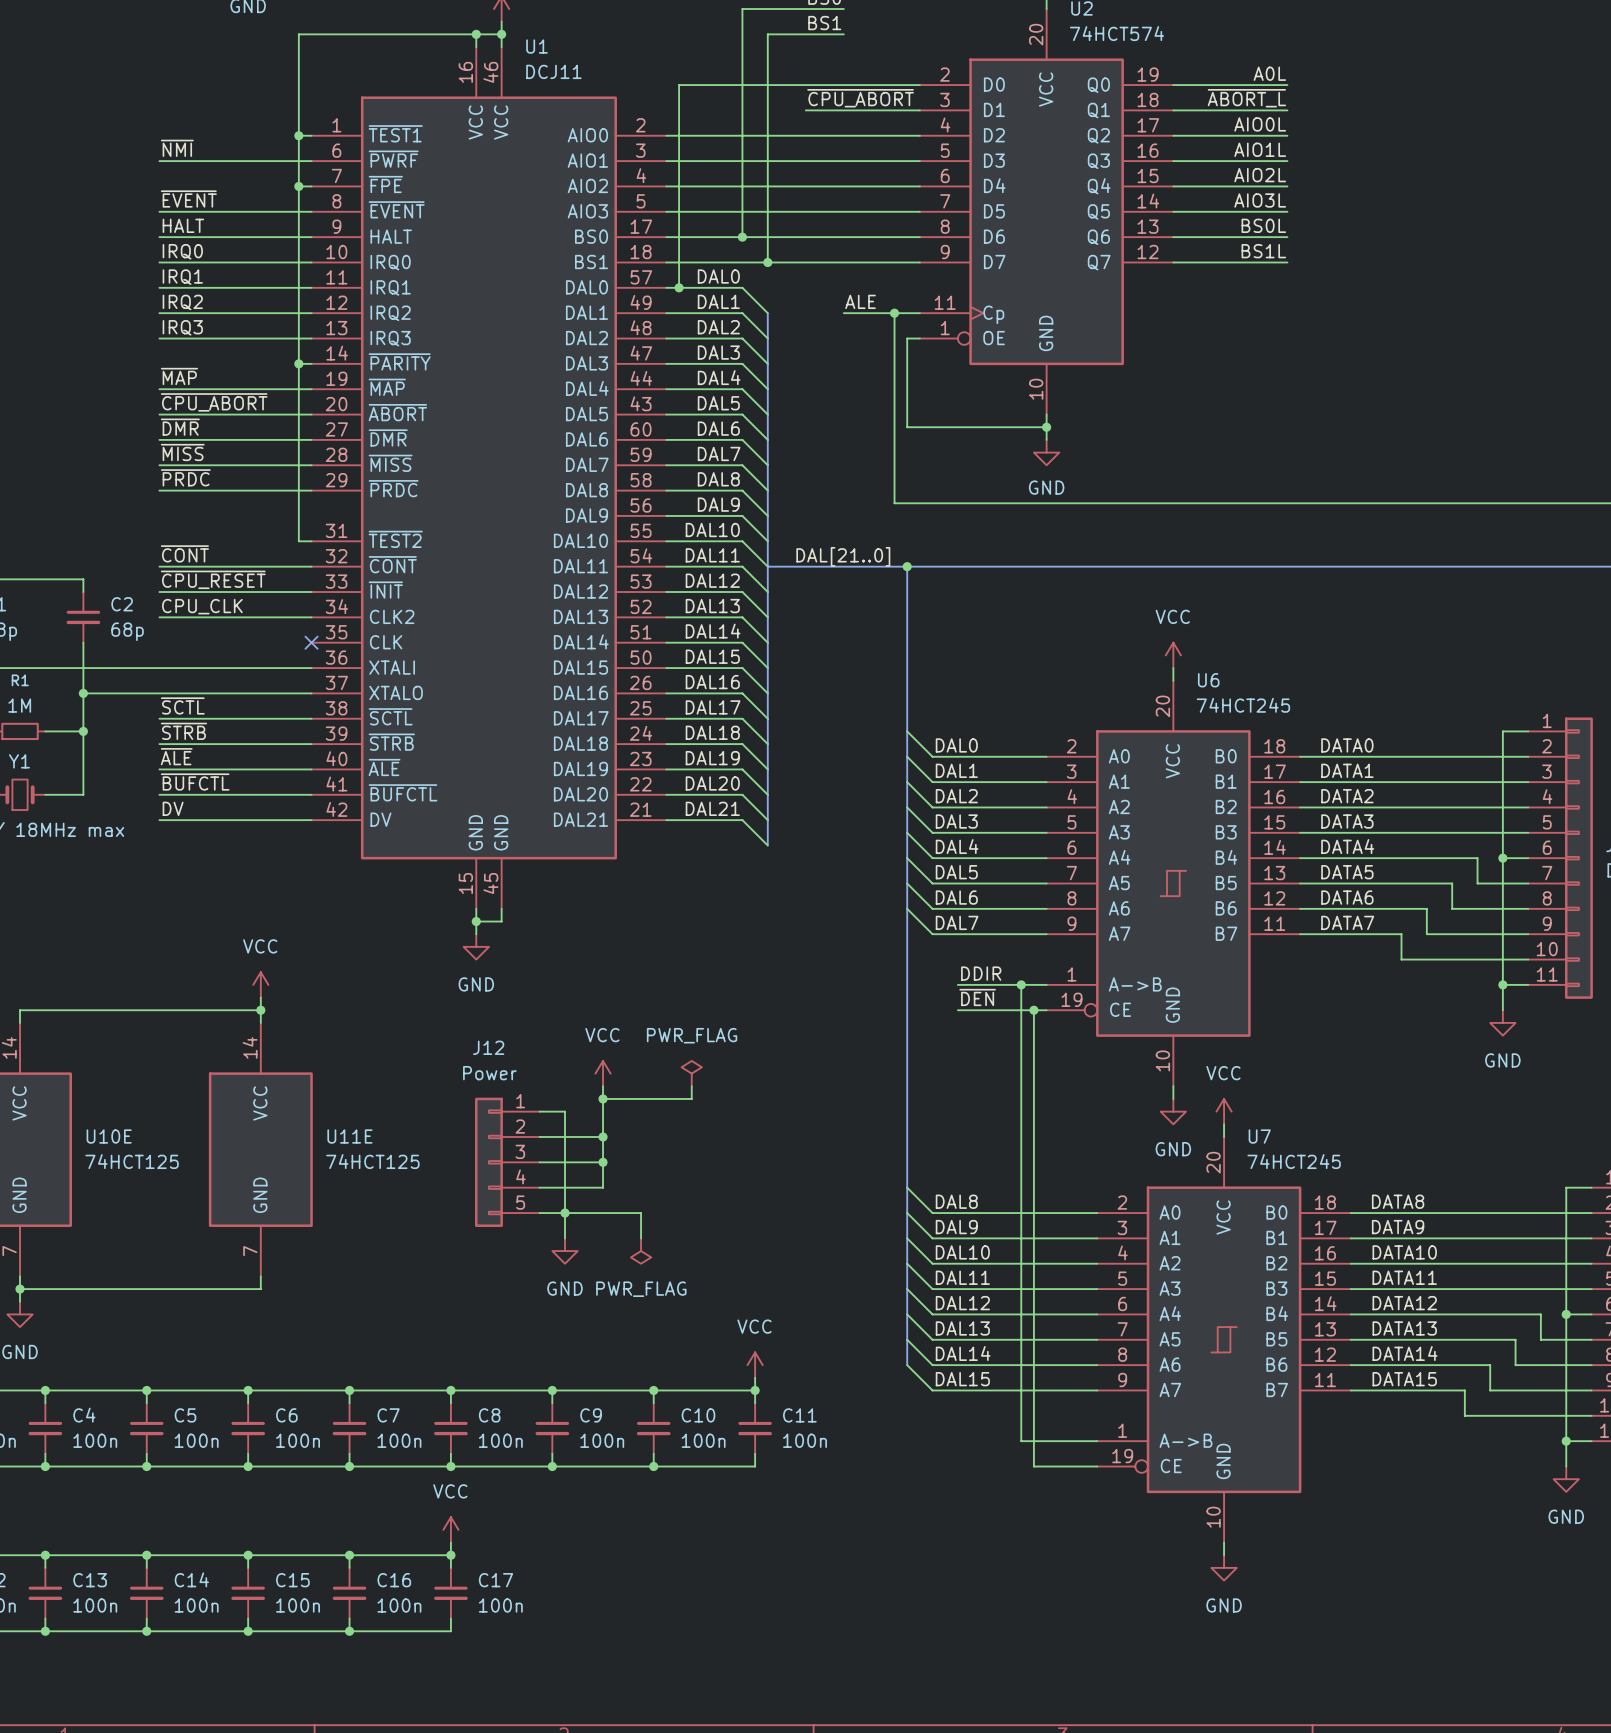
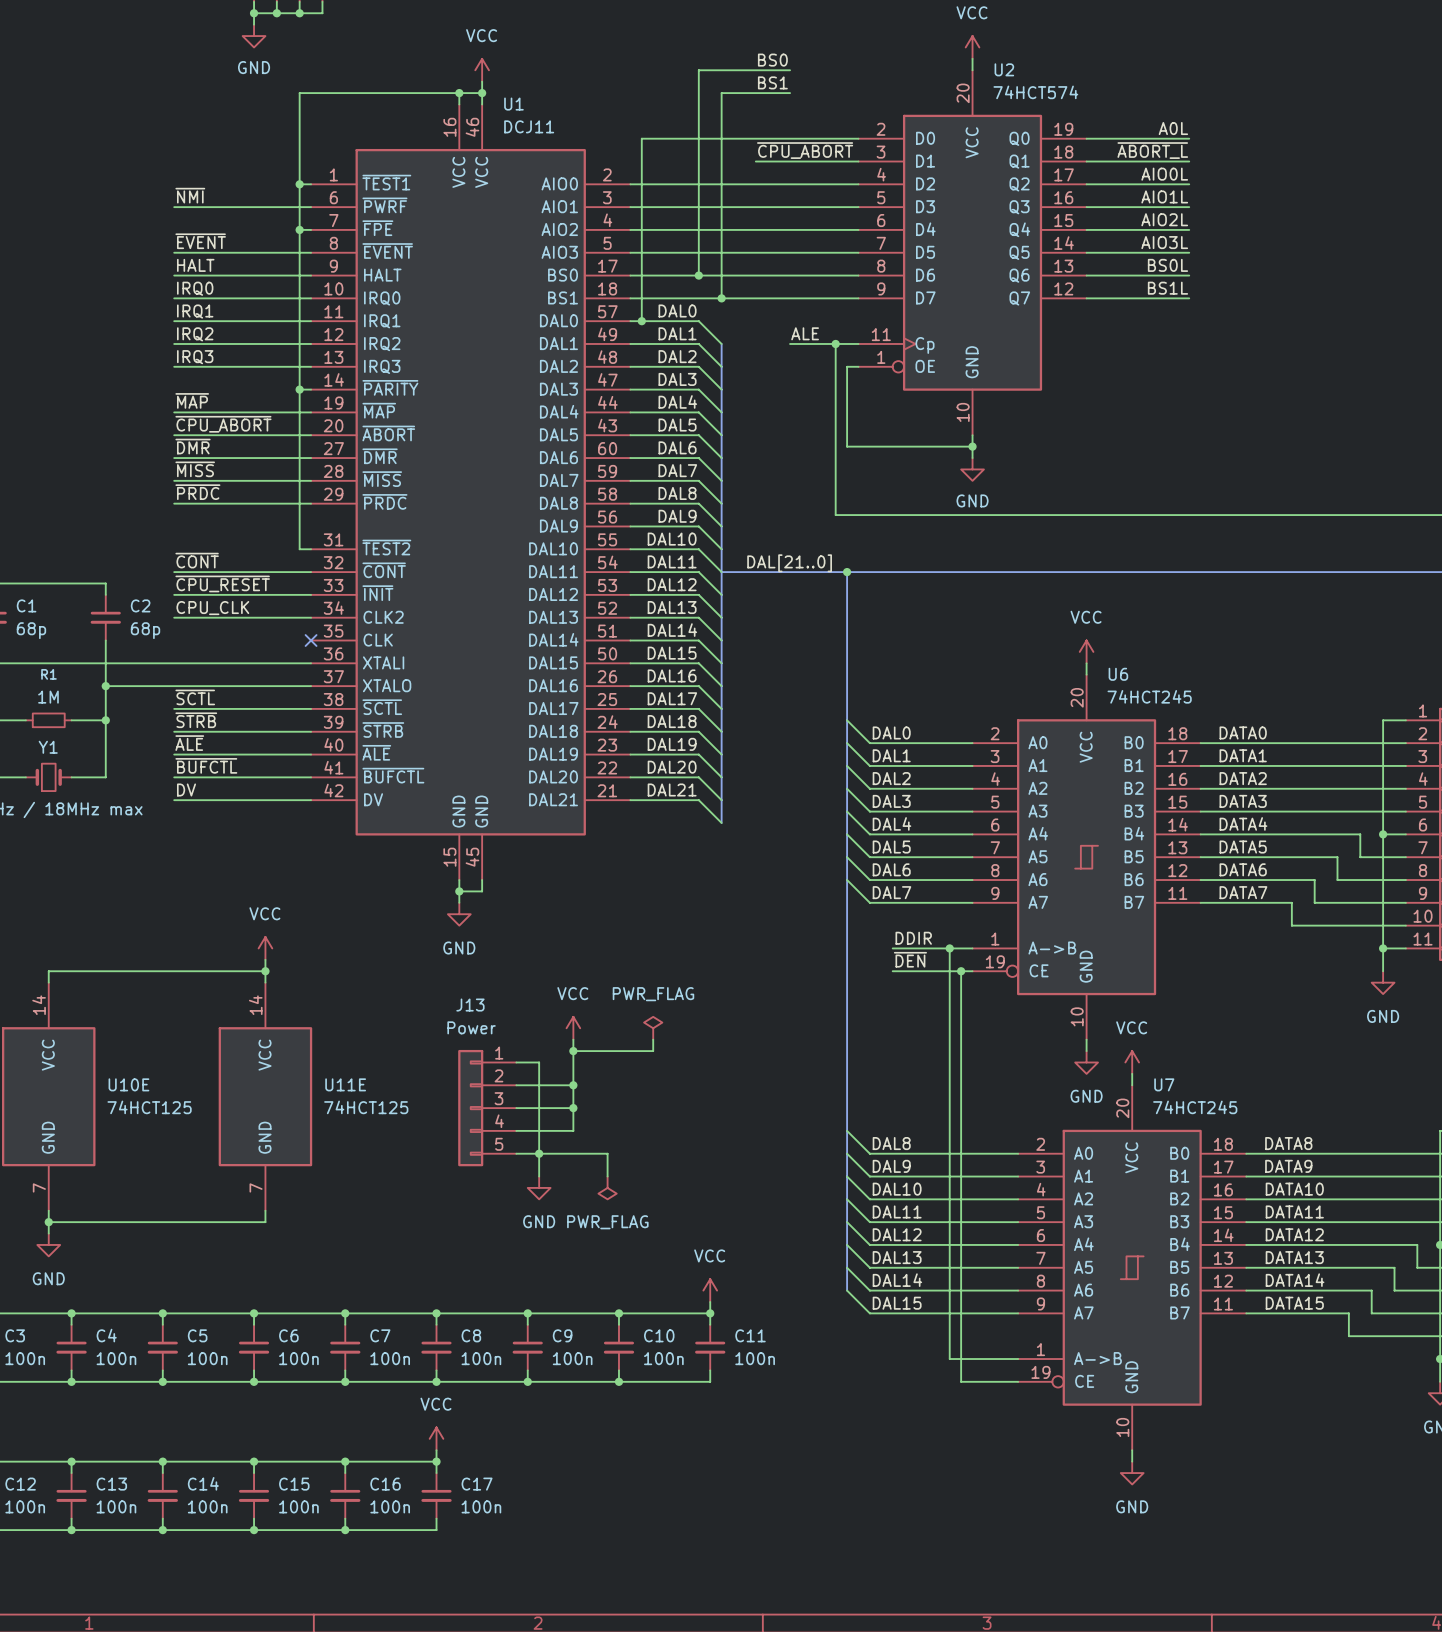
J12 name: J12 (488, 1047) -> J13 (470, 1005)

